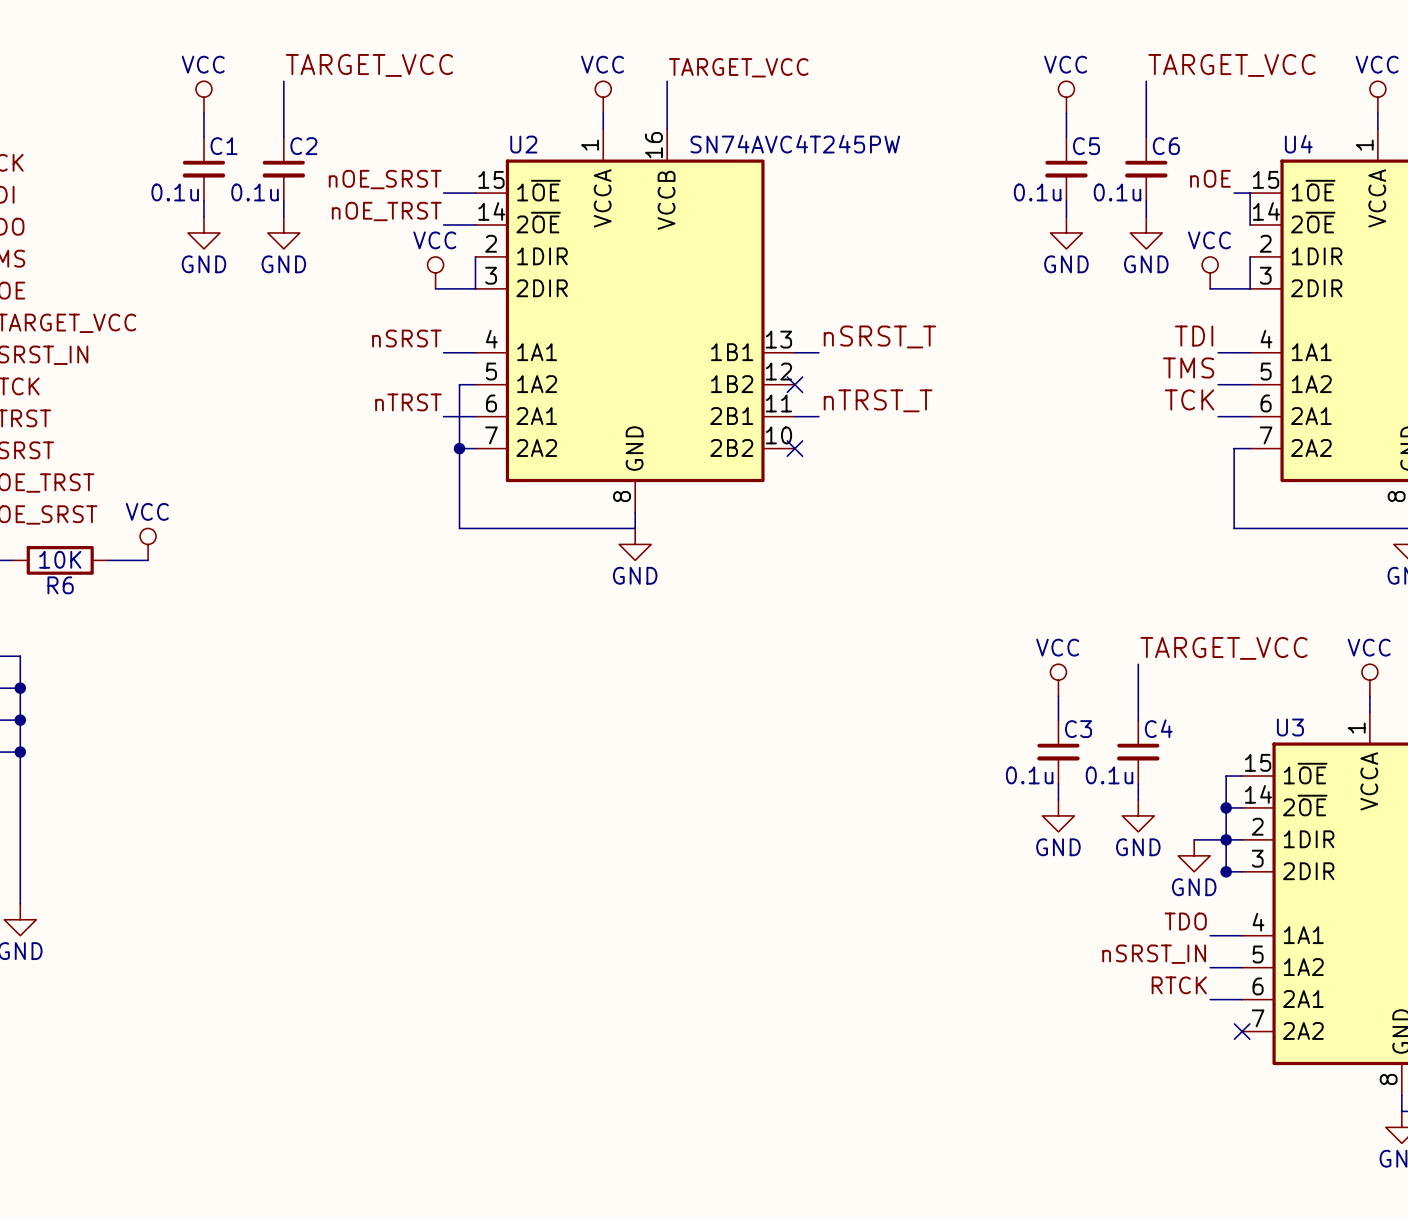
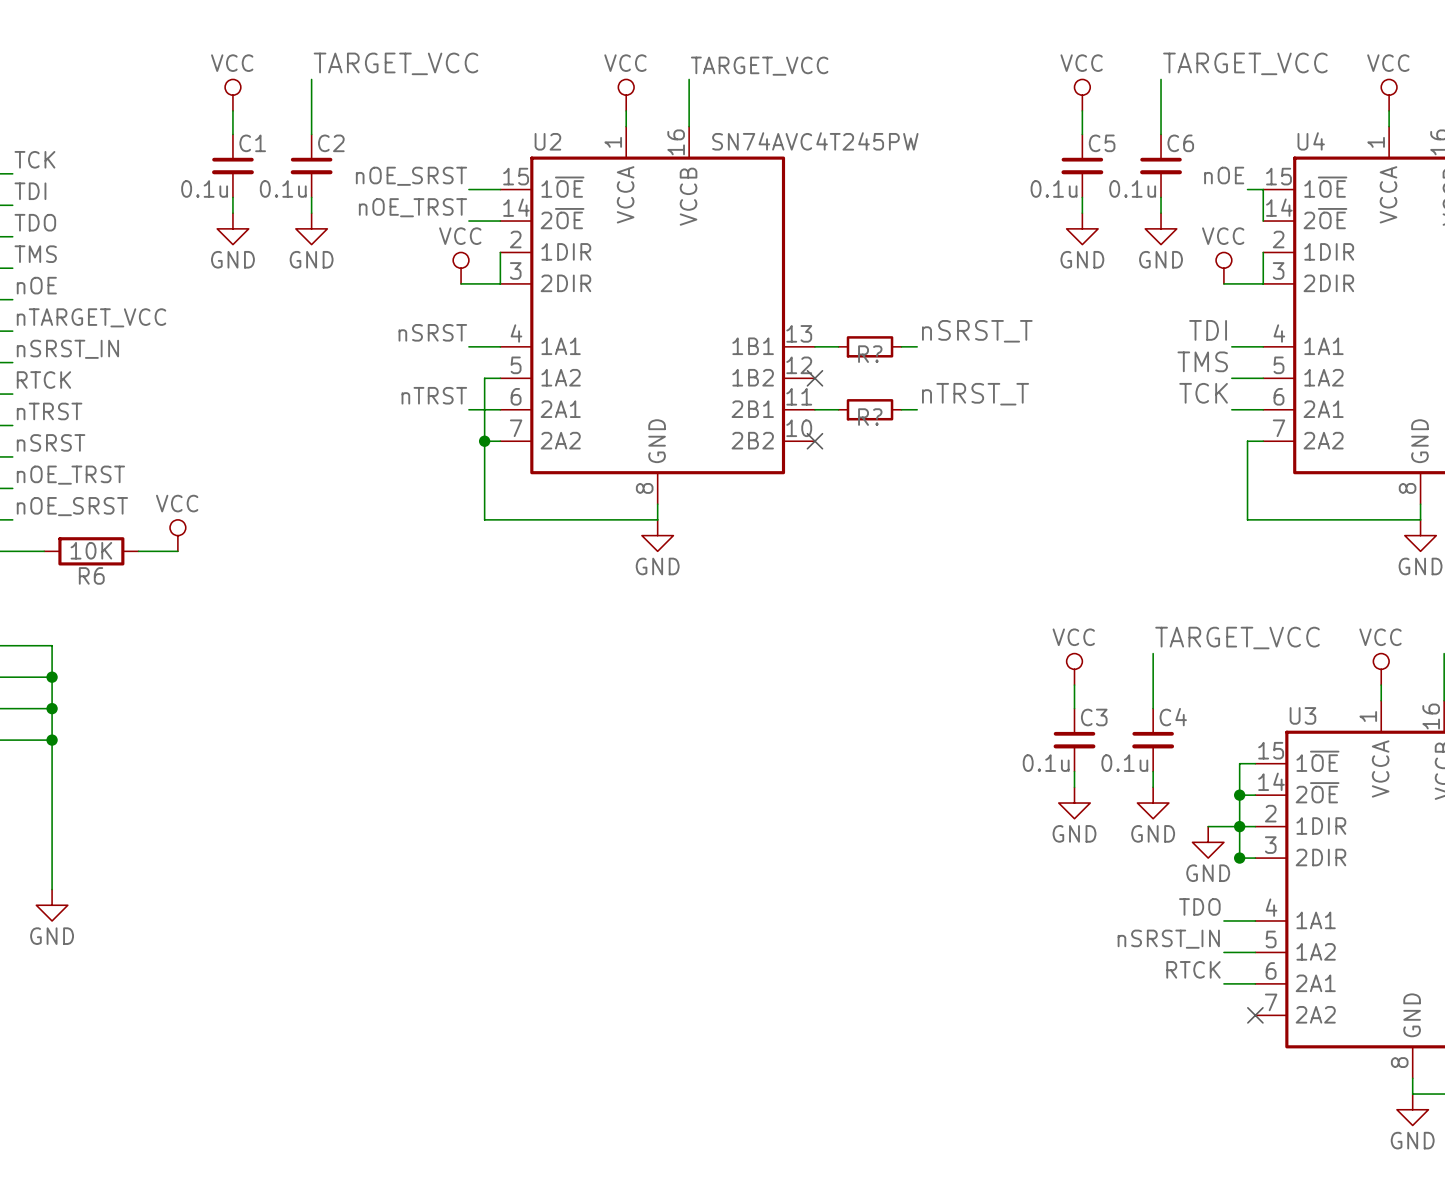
label position: nSRST_T (879, 336) -> nSRST_T (977, 331)
R?: none -> (870, 346)
wire: none -> (901, 346) (917, 346)
label position: nTRST_T (878, 400) -> nTRST_T (975, 394)
R?: none -> (870, 409)
wire: none -> (901, 409) (917, 409)

